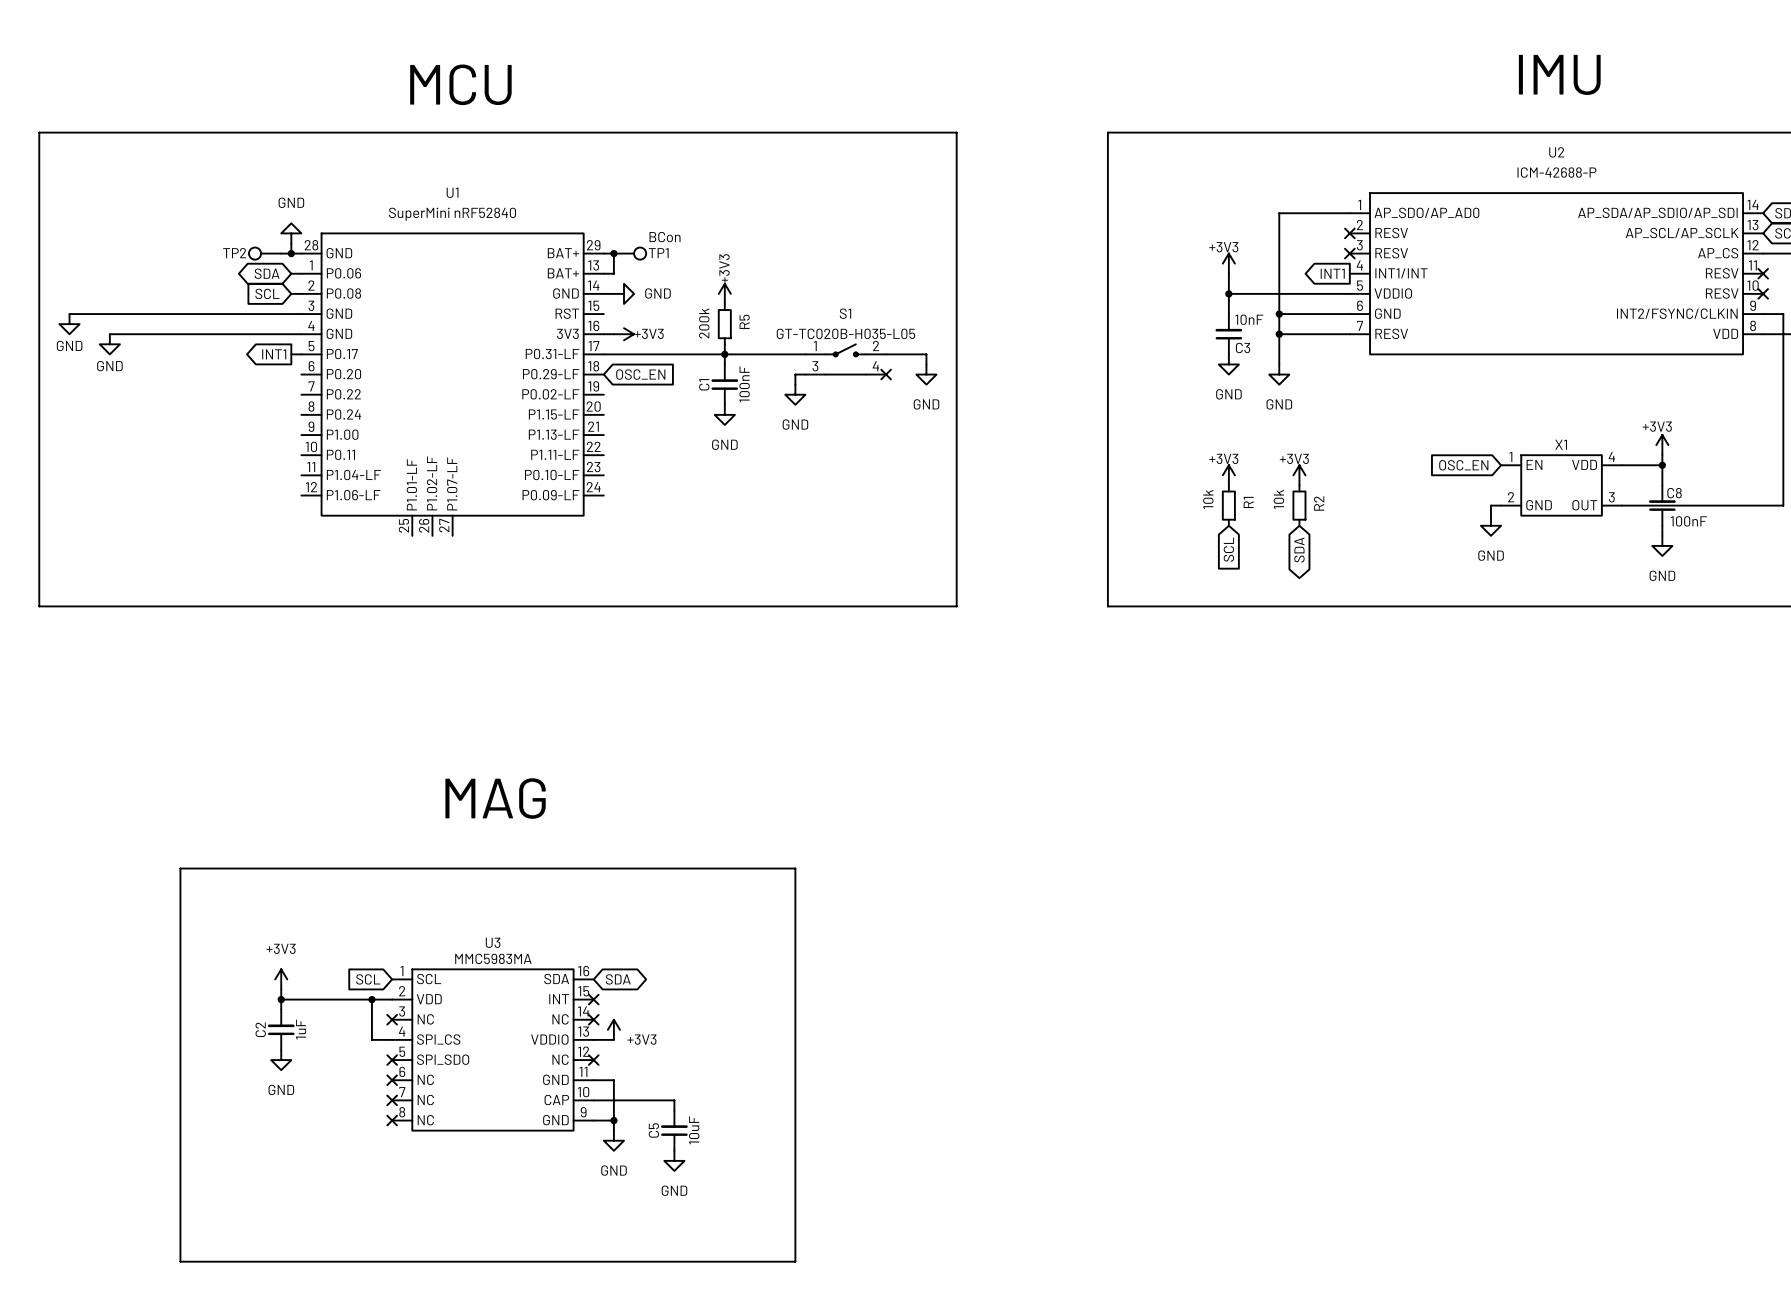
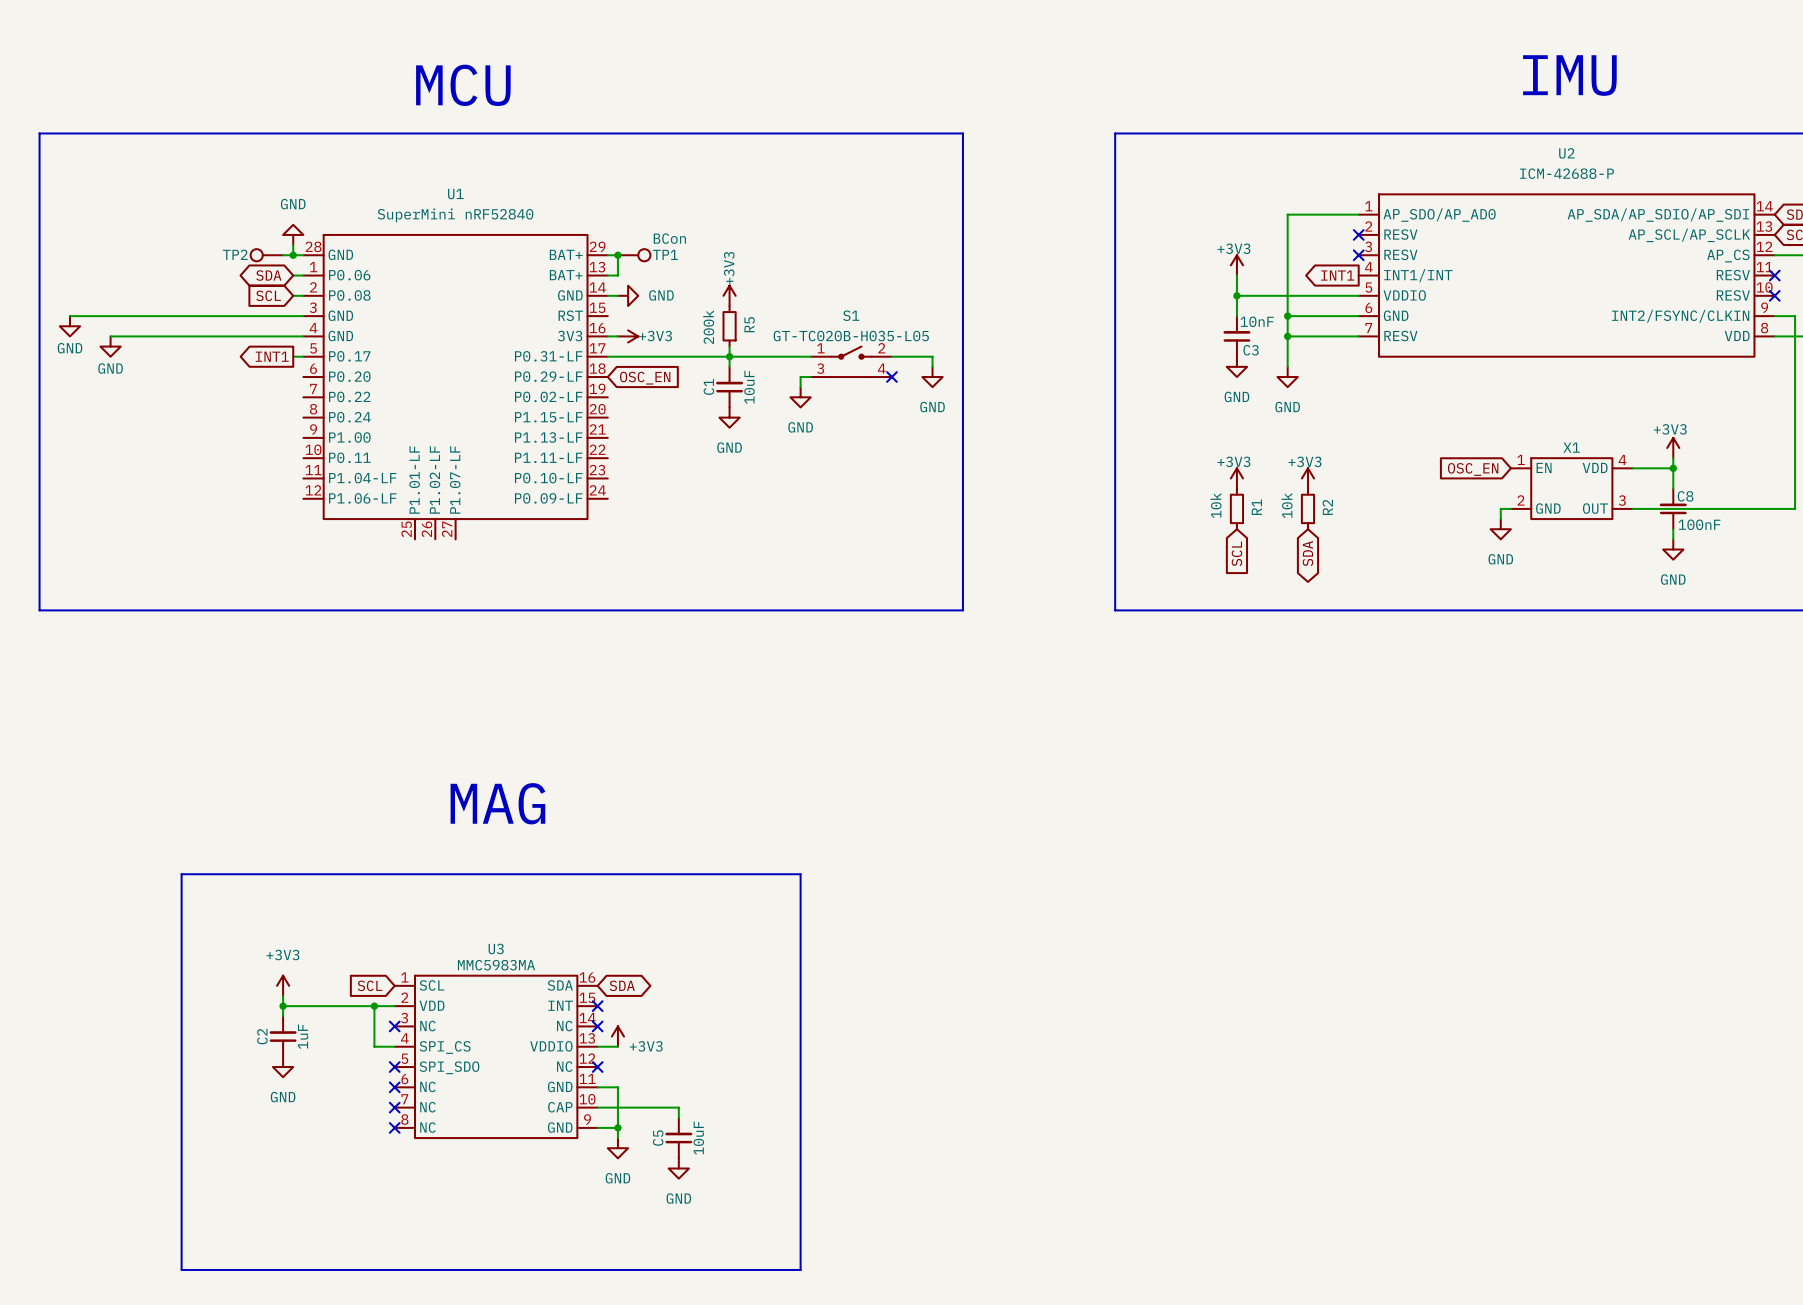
C1 value: 100nF (744, 384) -> 10uF (749, 387)

